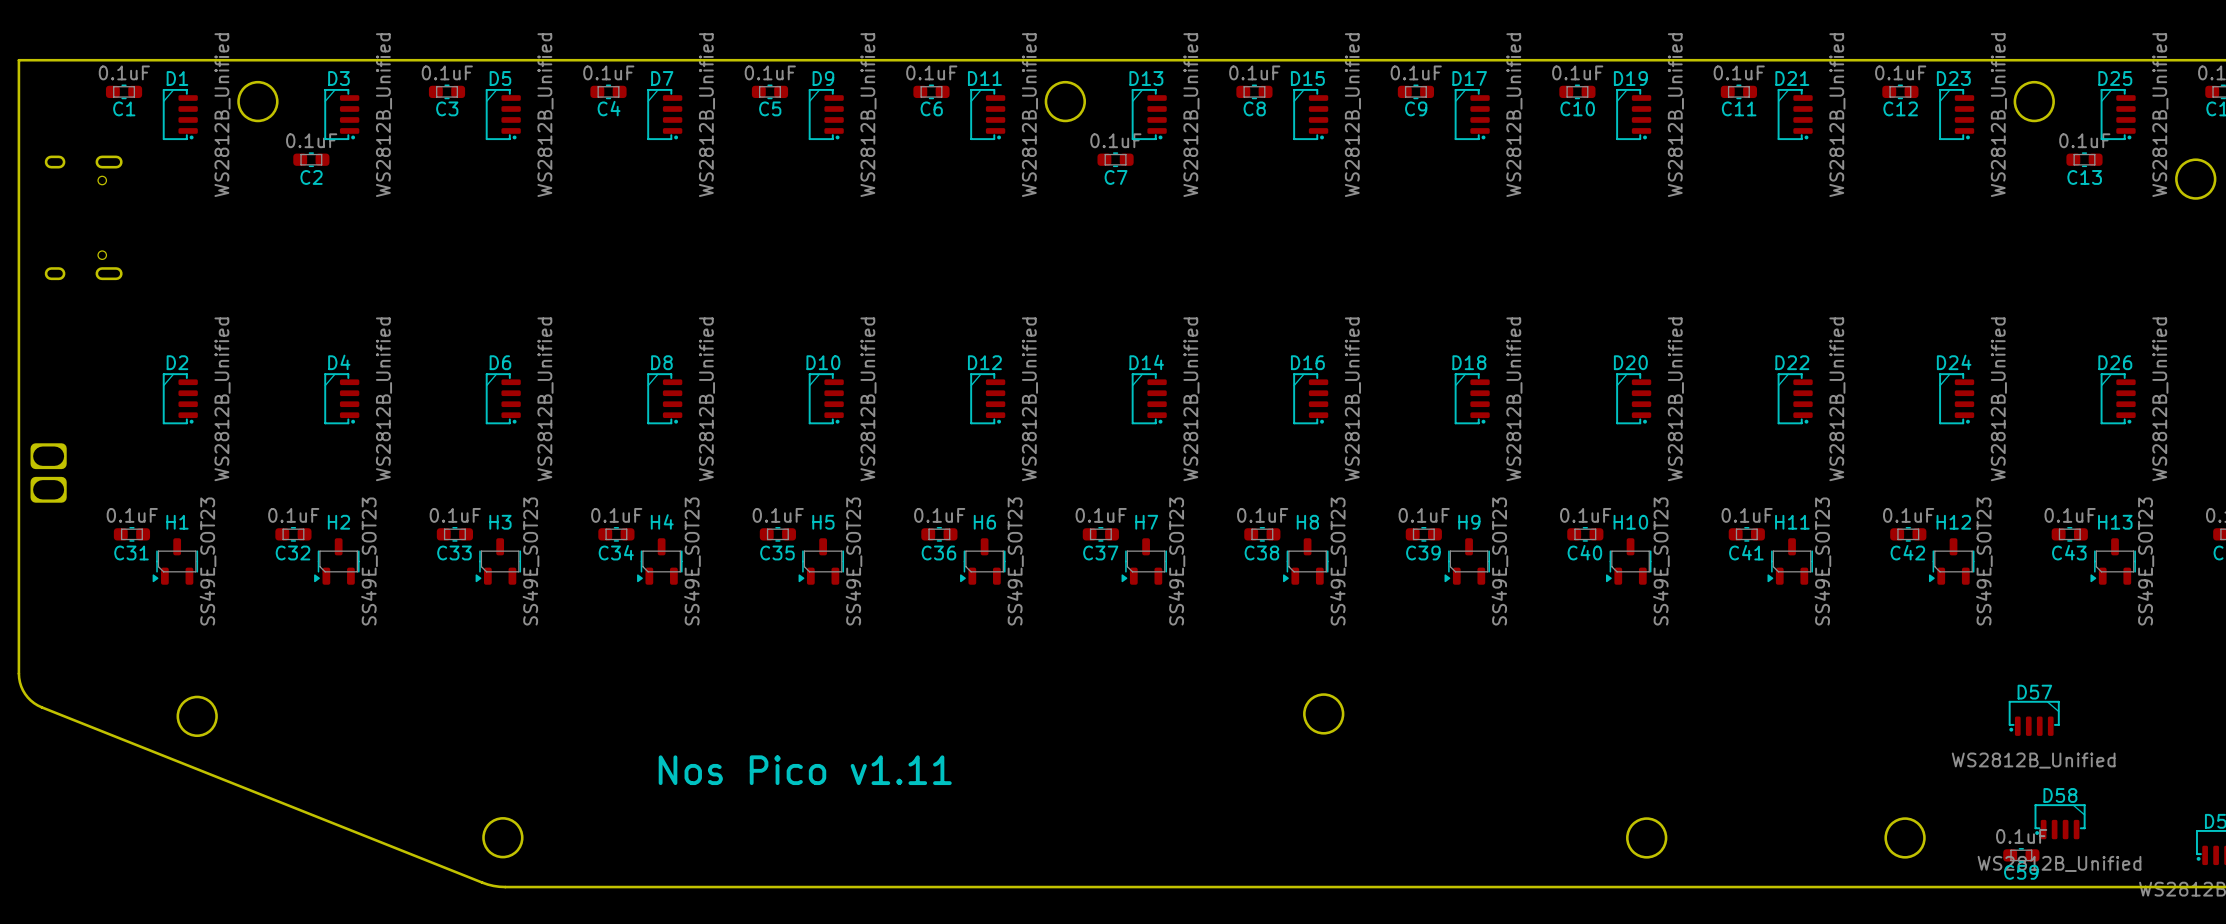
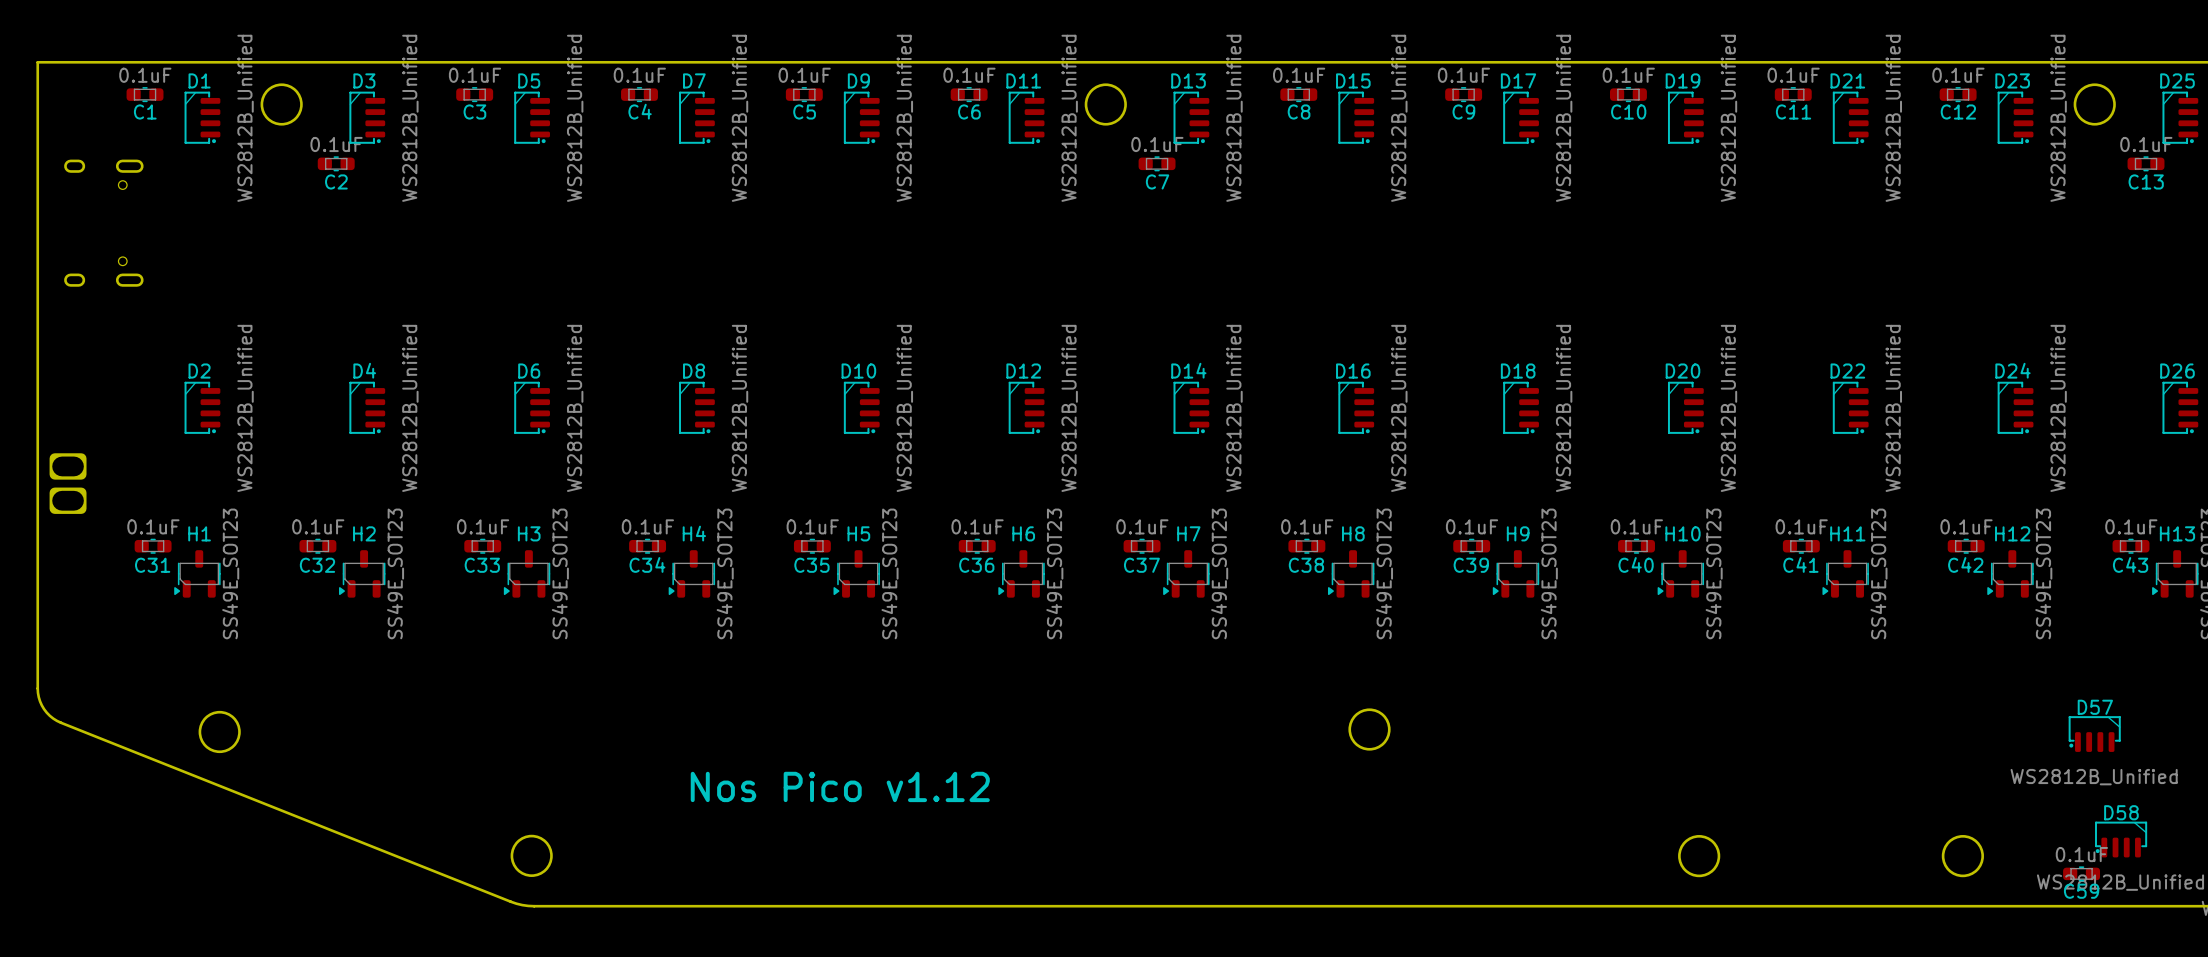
text: Nos Pico v1.11 (805, 770) -> Nos Pico v1.12 (840, 786)

